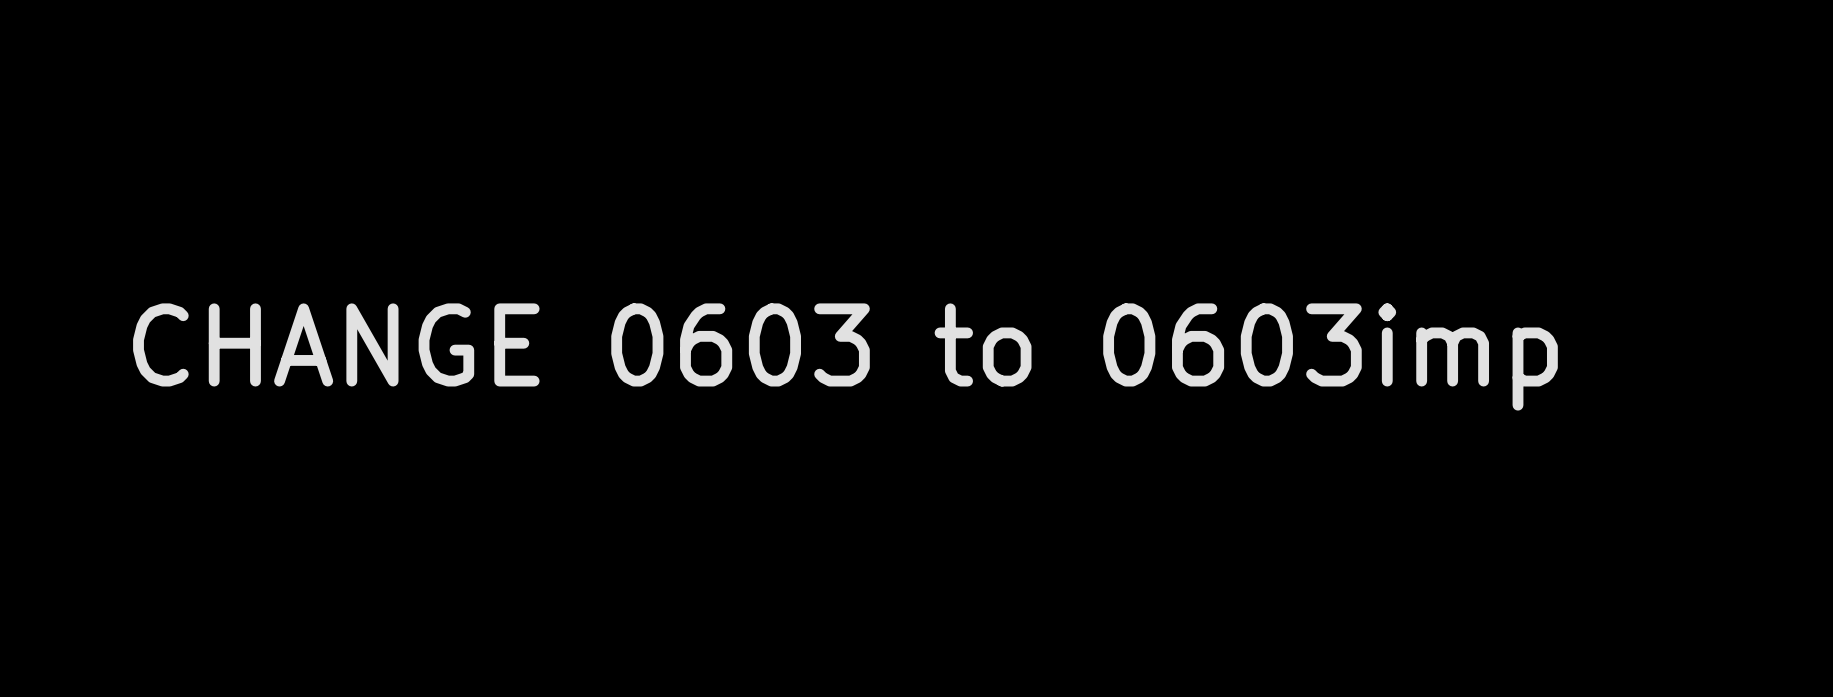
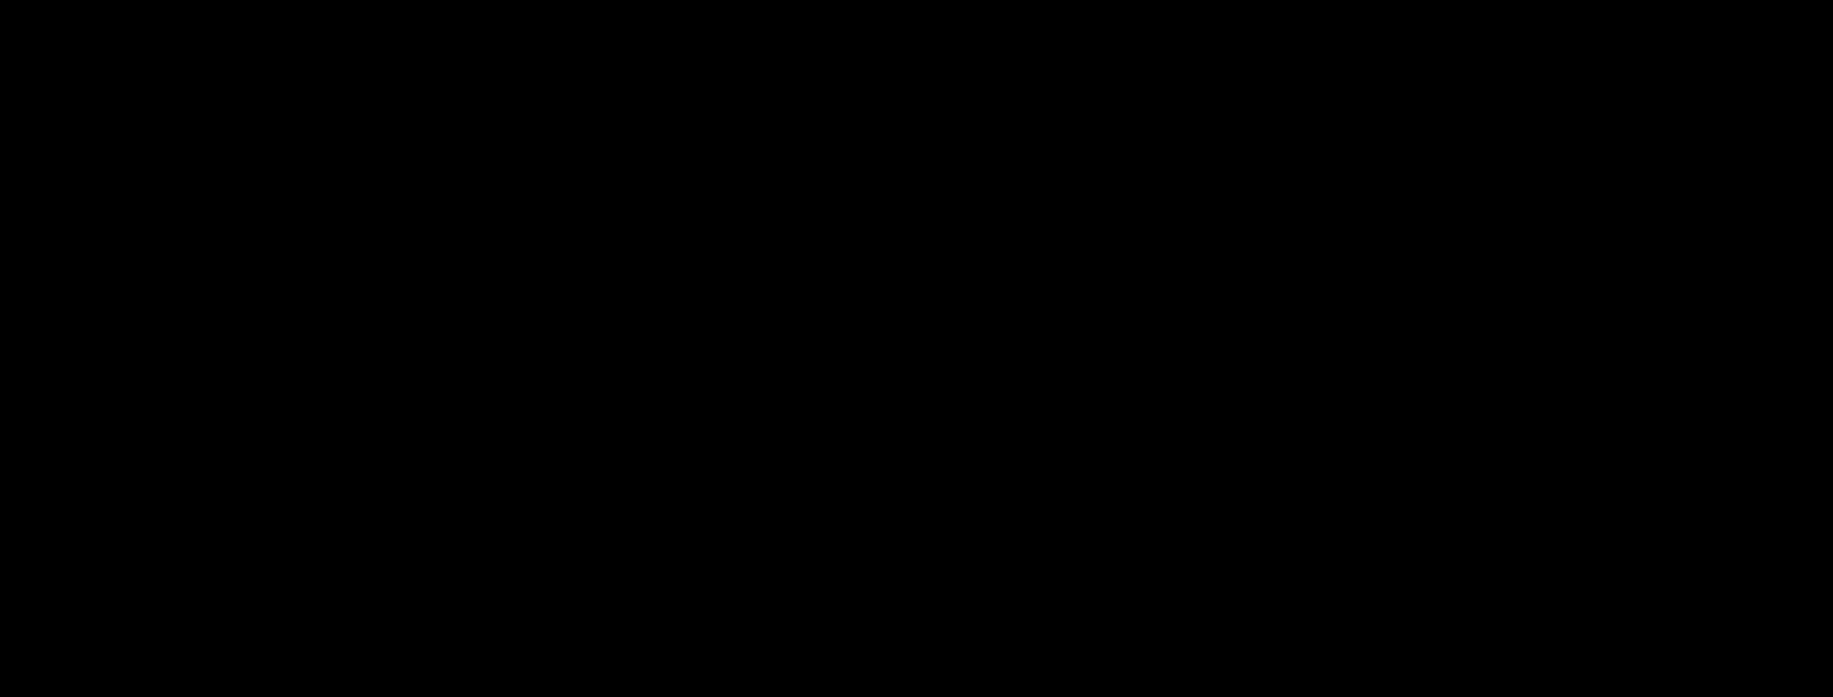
text: CHANGE 0603 to 0603imp (845, 356) -> none

